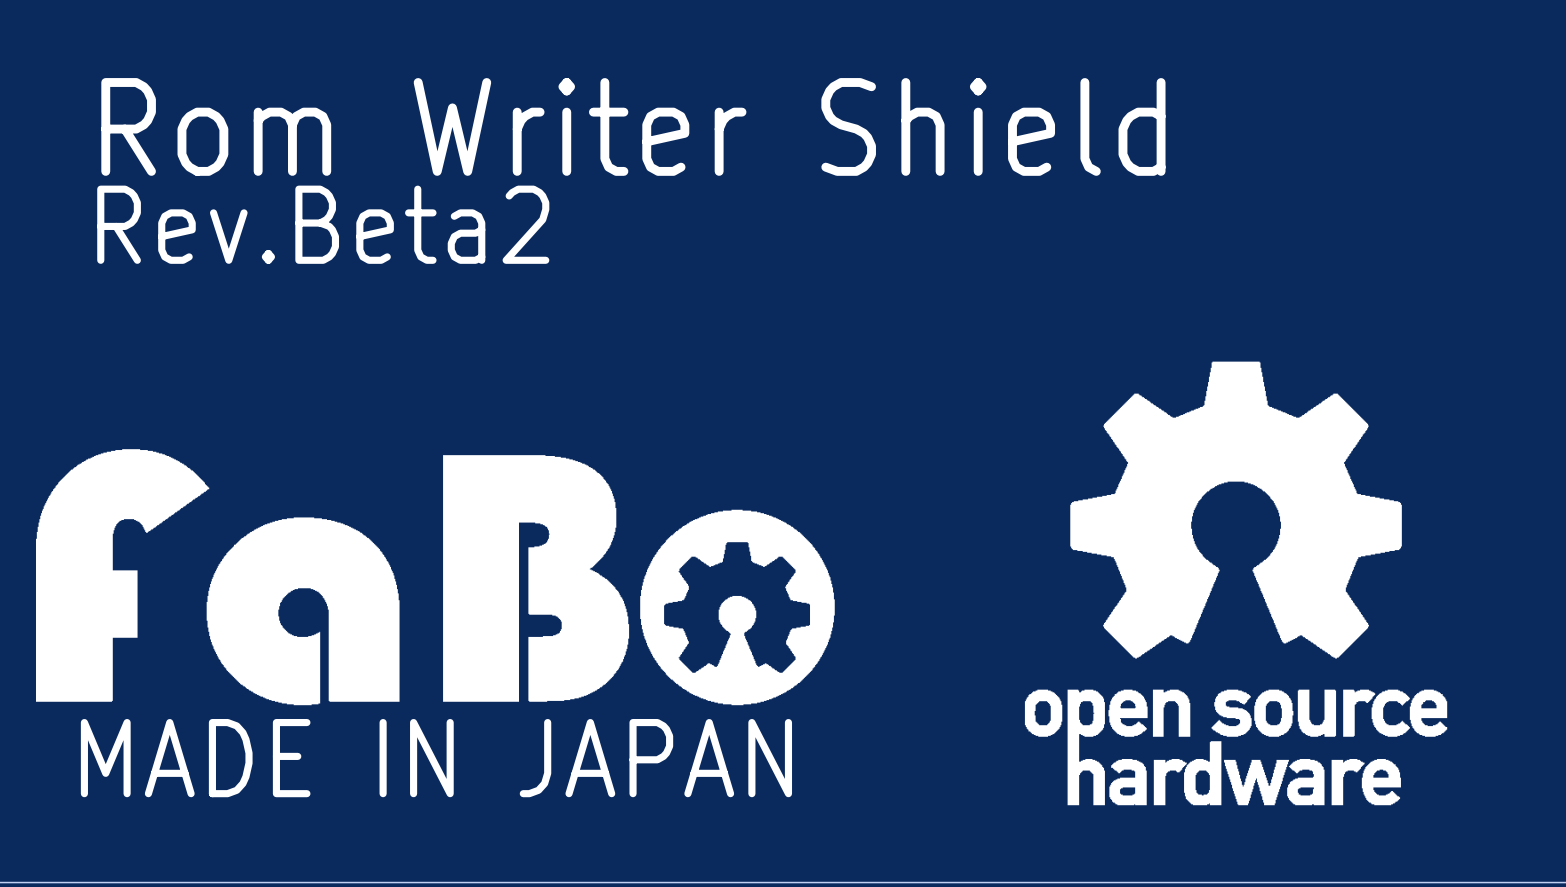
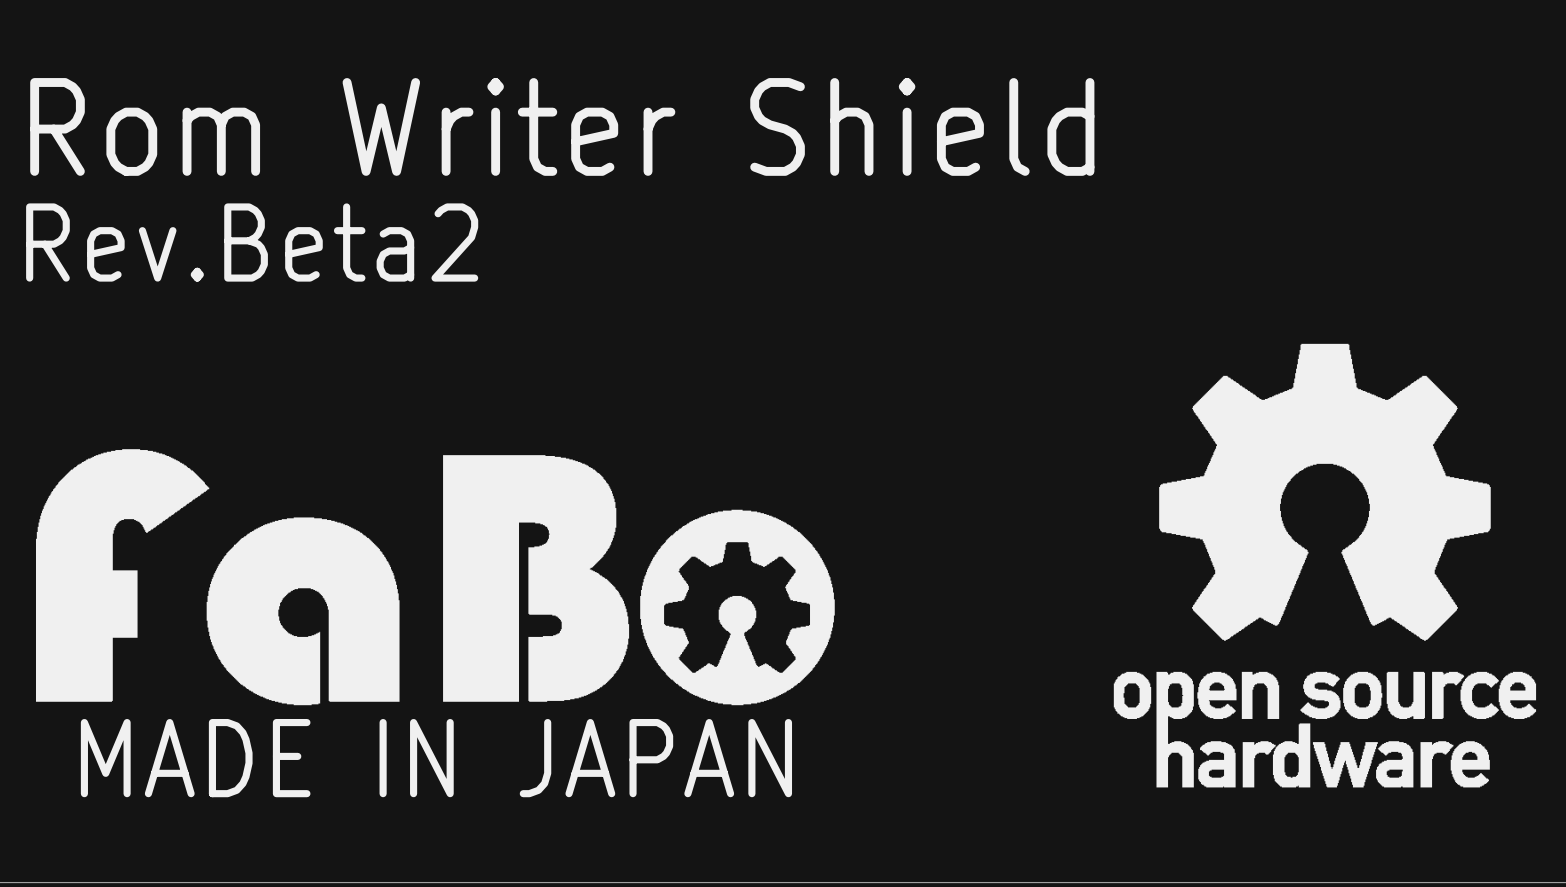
text position: Rom Writer Shield (633, 126) -> Rom Writer Shield (562, 126)
text position: Rev.Beta2 (323, 224) -> Rev.Beta2 (252, 242)
drawing position: (1236, 583) -> (1324, 565)

